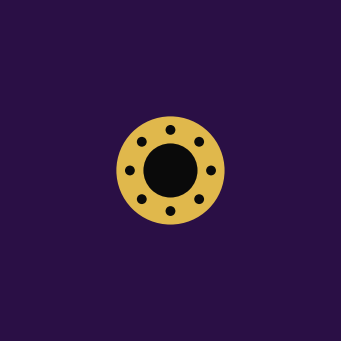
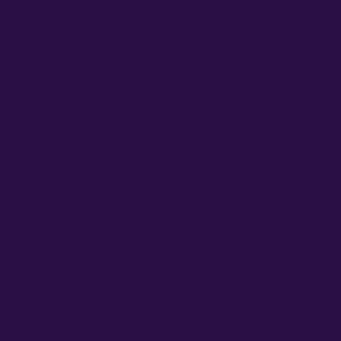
part: (170, 170) -> none

